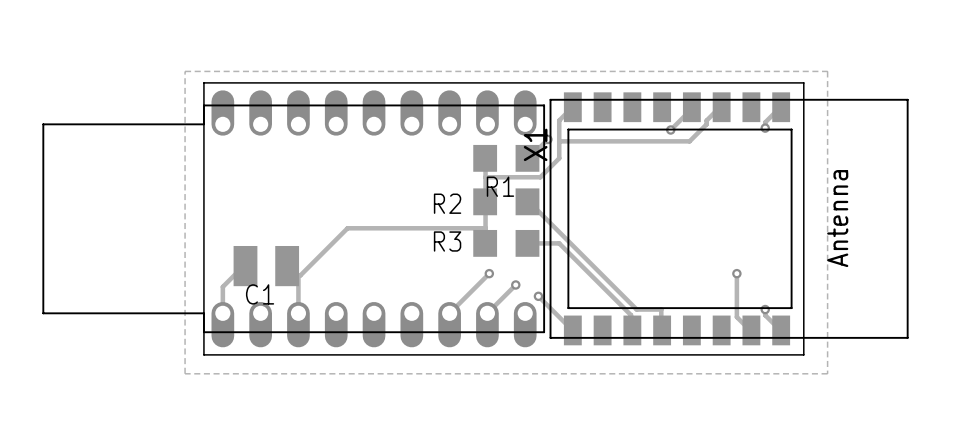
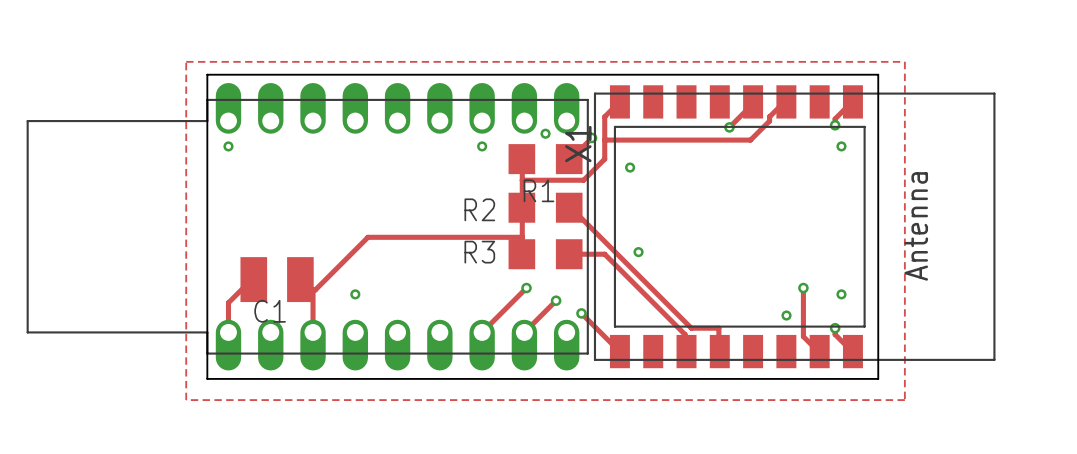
via: none -> (545, 133)
via: none -> (228, 146)
via: none -> (482, 146)
via: none -> (841, 146)
via: none -> (630, 167)
via: none -> (638, 252)
via: none -> (355, 294)
via: none -> (841, 294)
via: none -> (786, 315)

